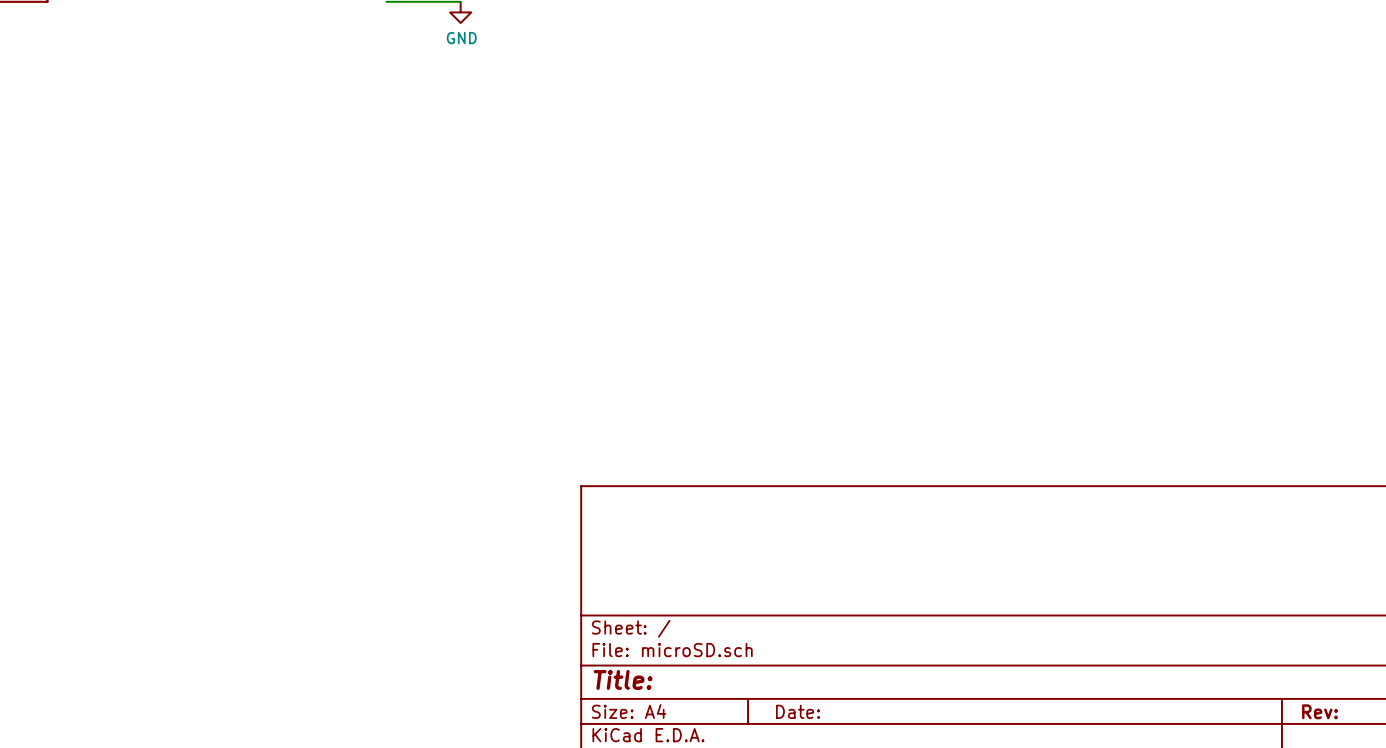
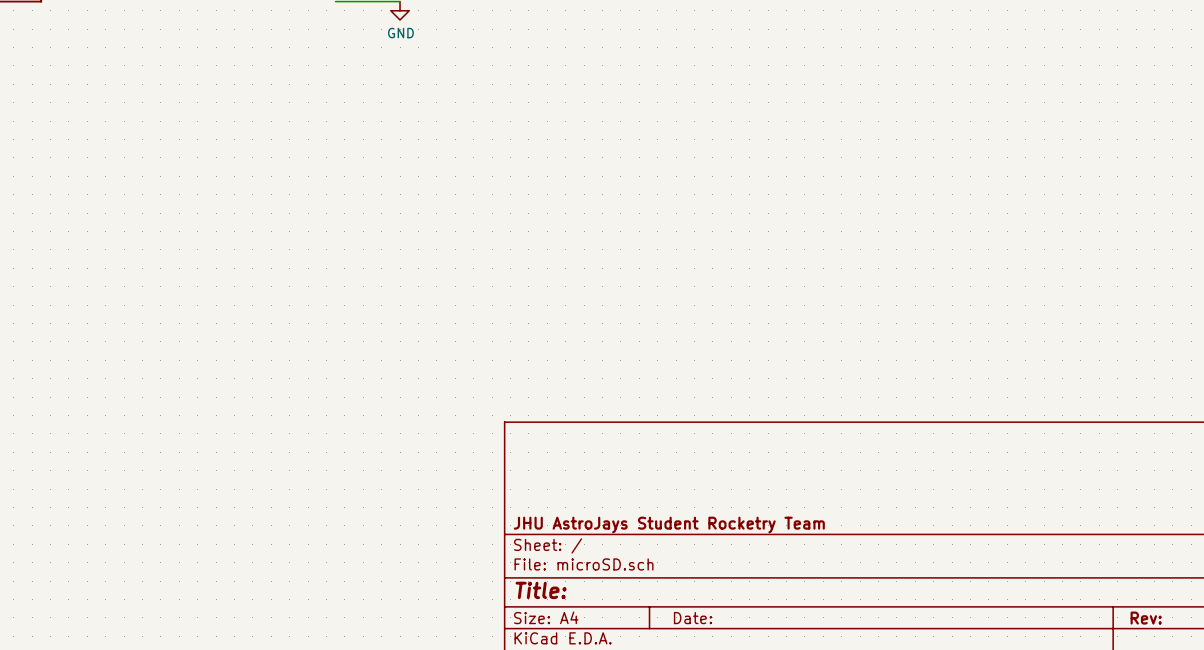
title block: none -> JHU AstroJays Student Rocketry Team (669, 524)

